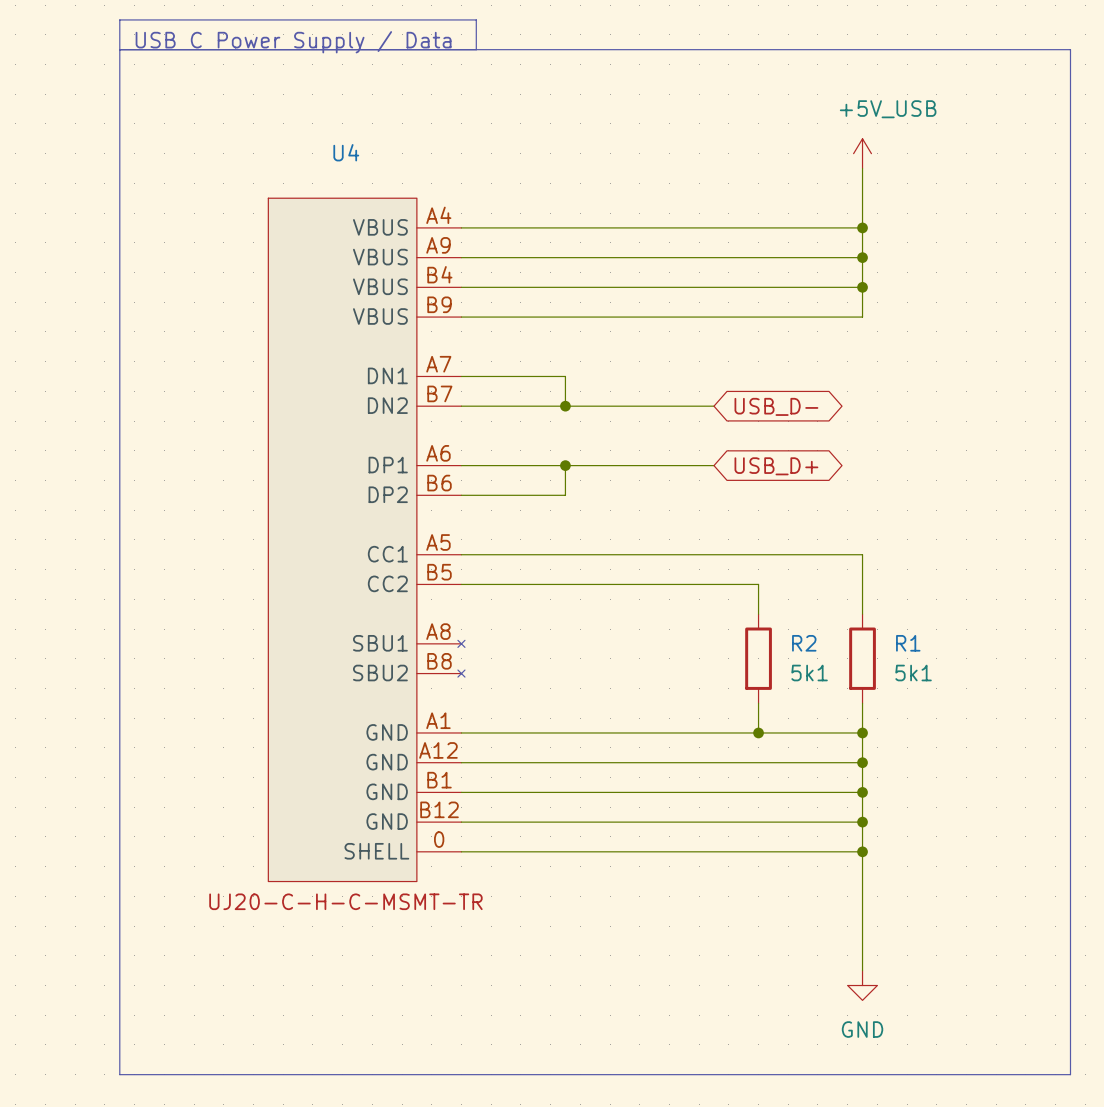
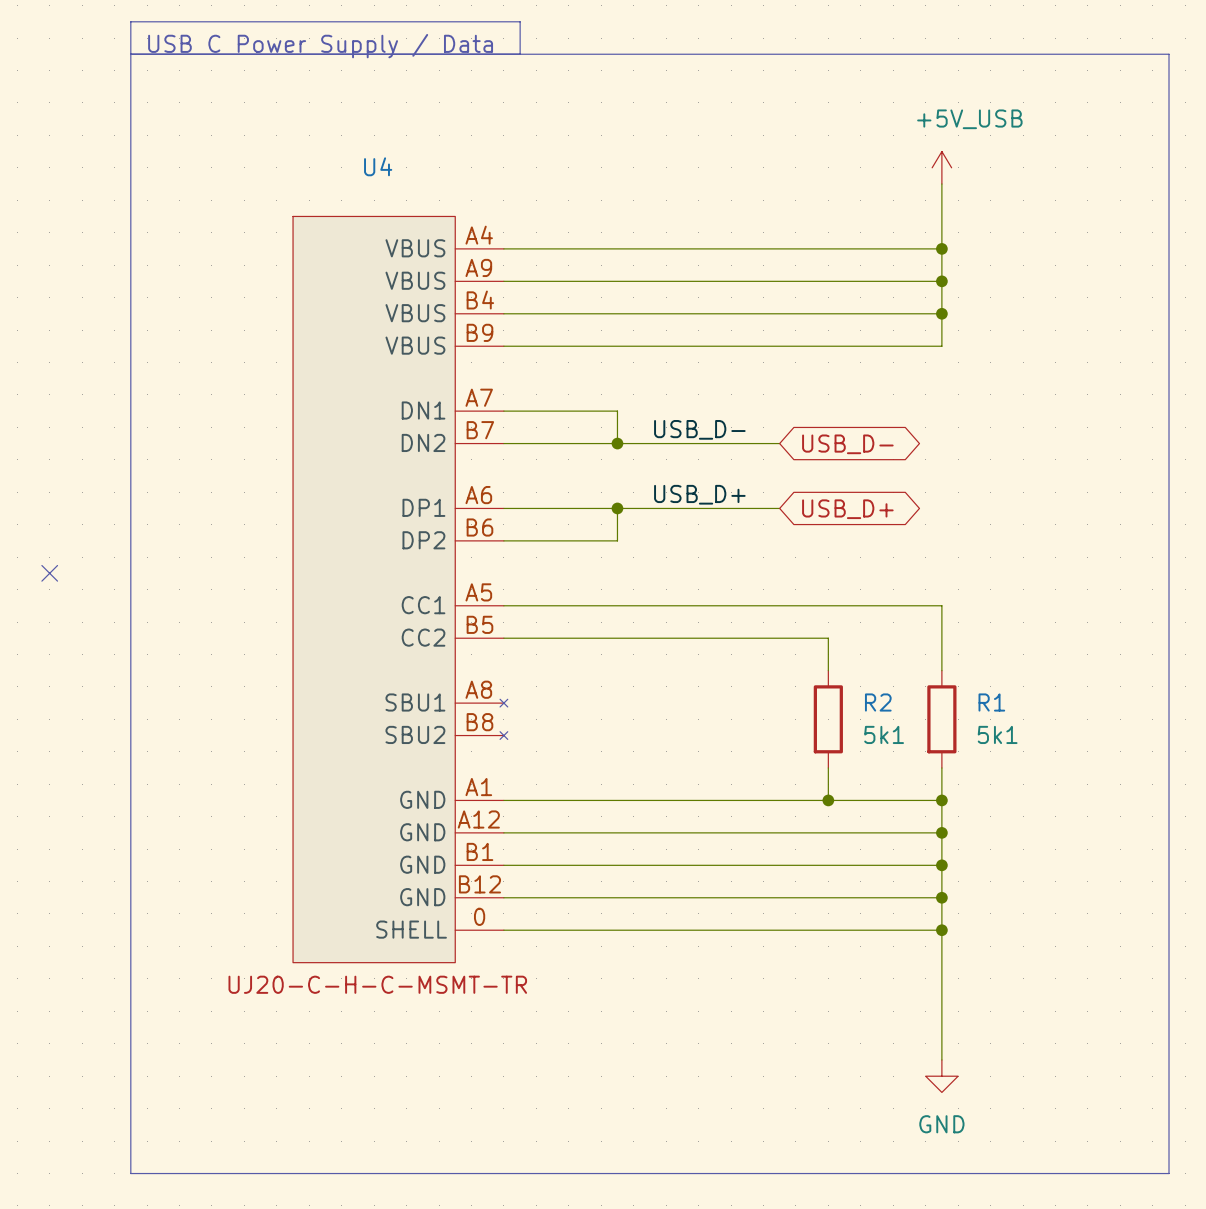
label: none -> USB_D- (699, 429)
label: none -> USB_D+ (699, 494)
no-connect mark: none -> (49, 573)

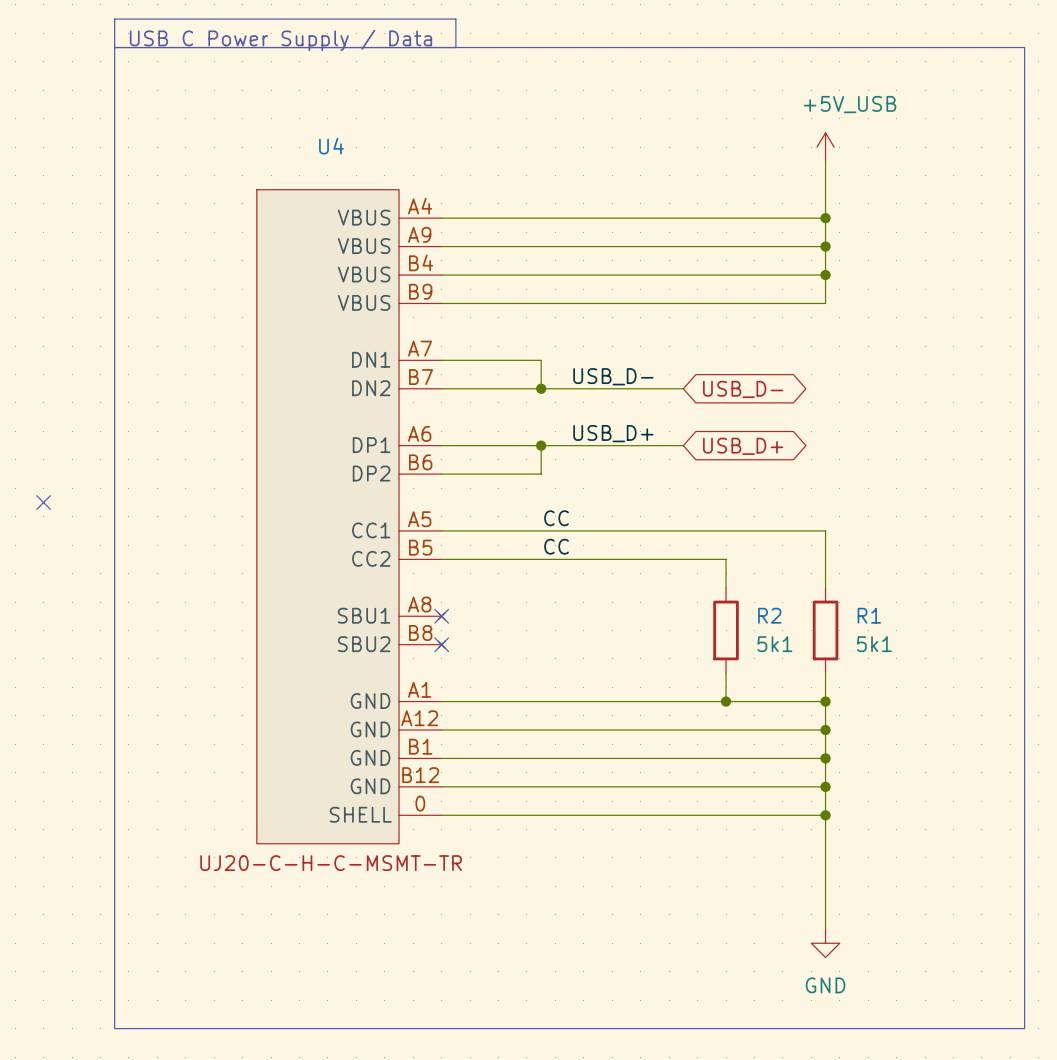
label: none -> CC (556, 518)
label: none -> CC (556, 546)
no-connect mark: none -> (441, 616)
no-connect mark: none -> (441, 644)

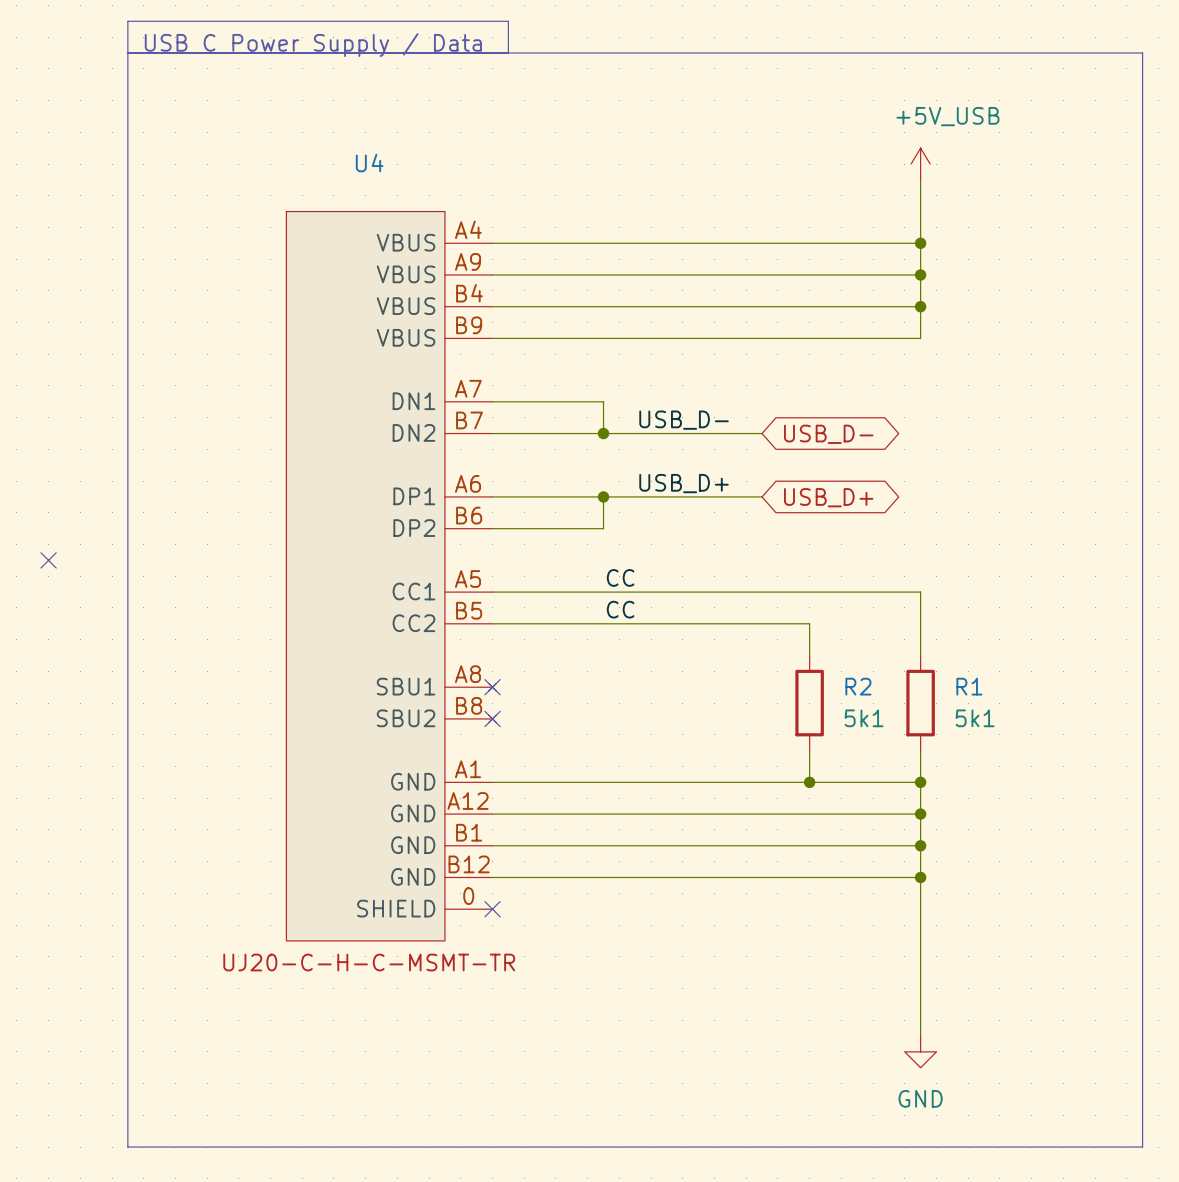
U4 pin name: SHELL (360, 814) -> SHIELD (396, 908)
wire: (441, 815) (825, 815) -> none
no-connect mark: none -> (492, 909)
junction: (825, 815) -> none

